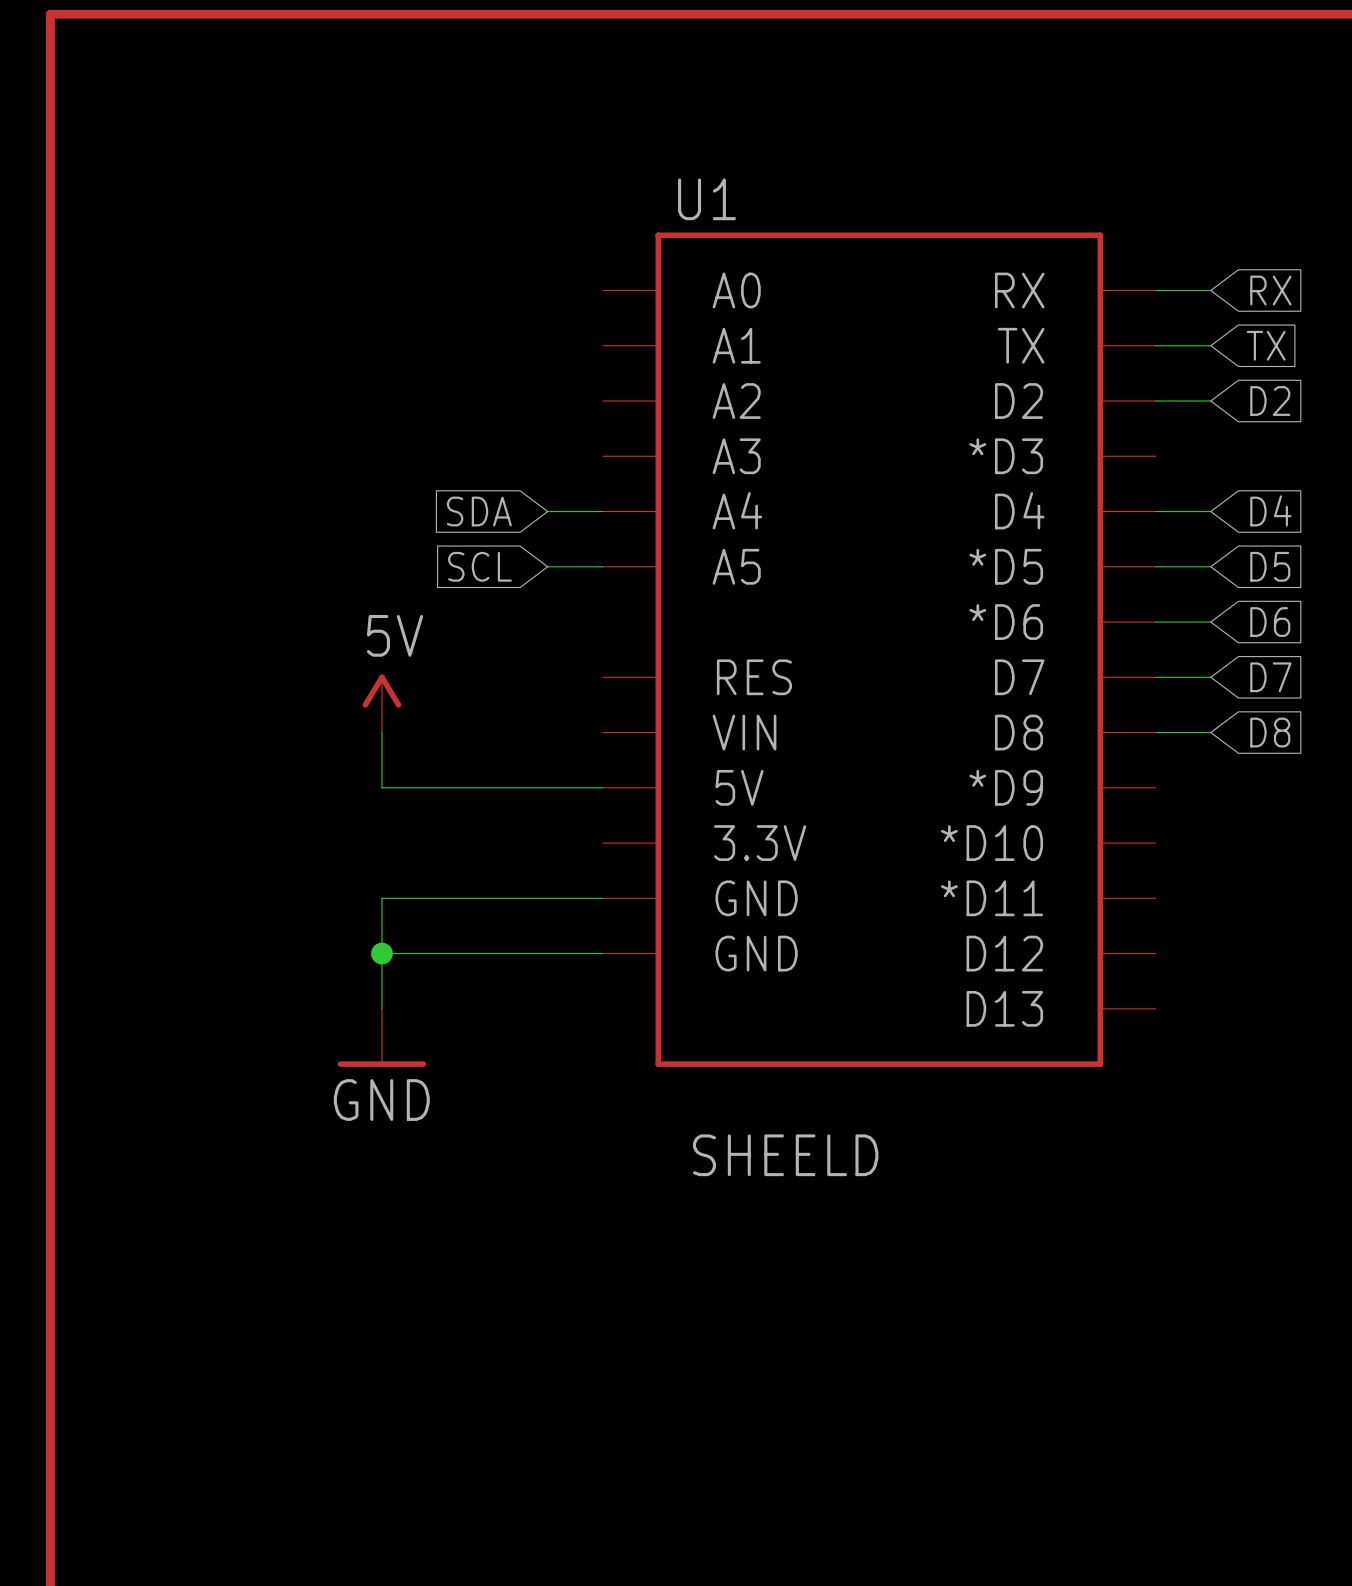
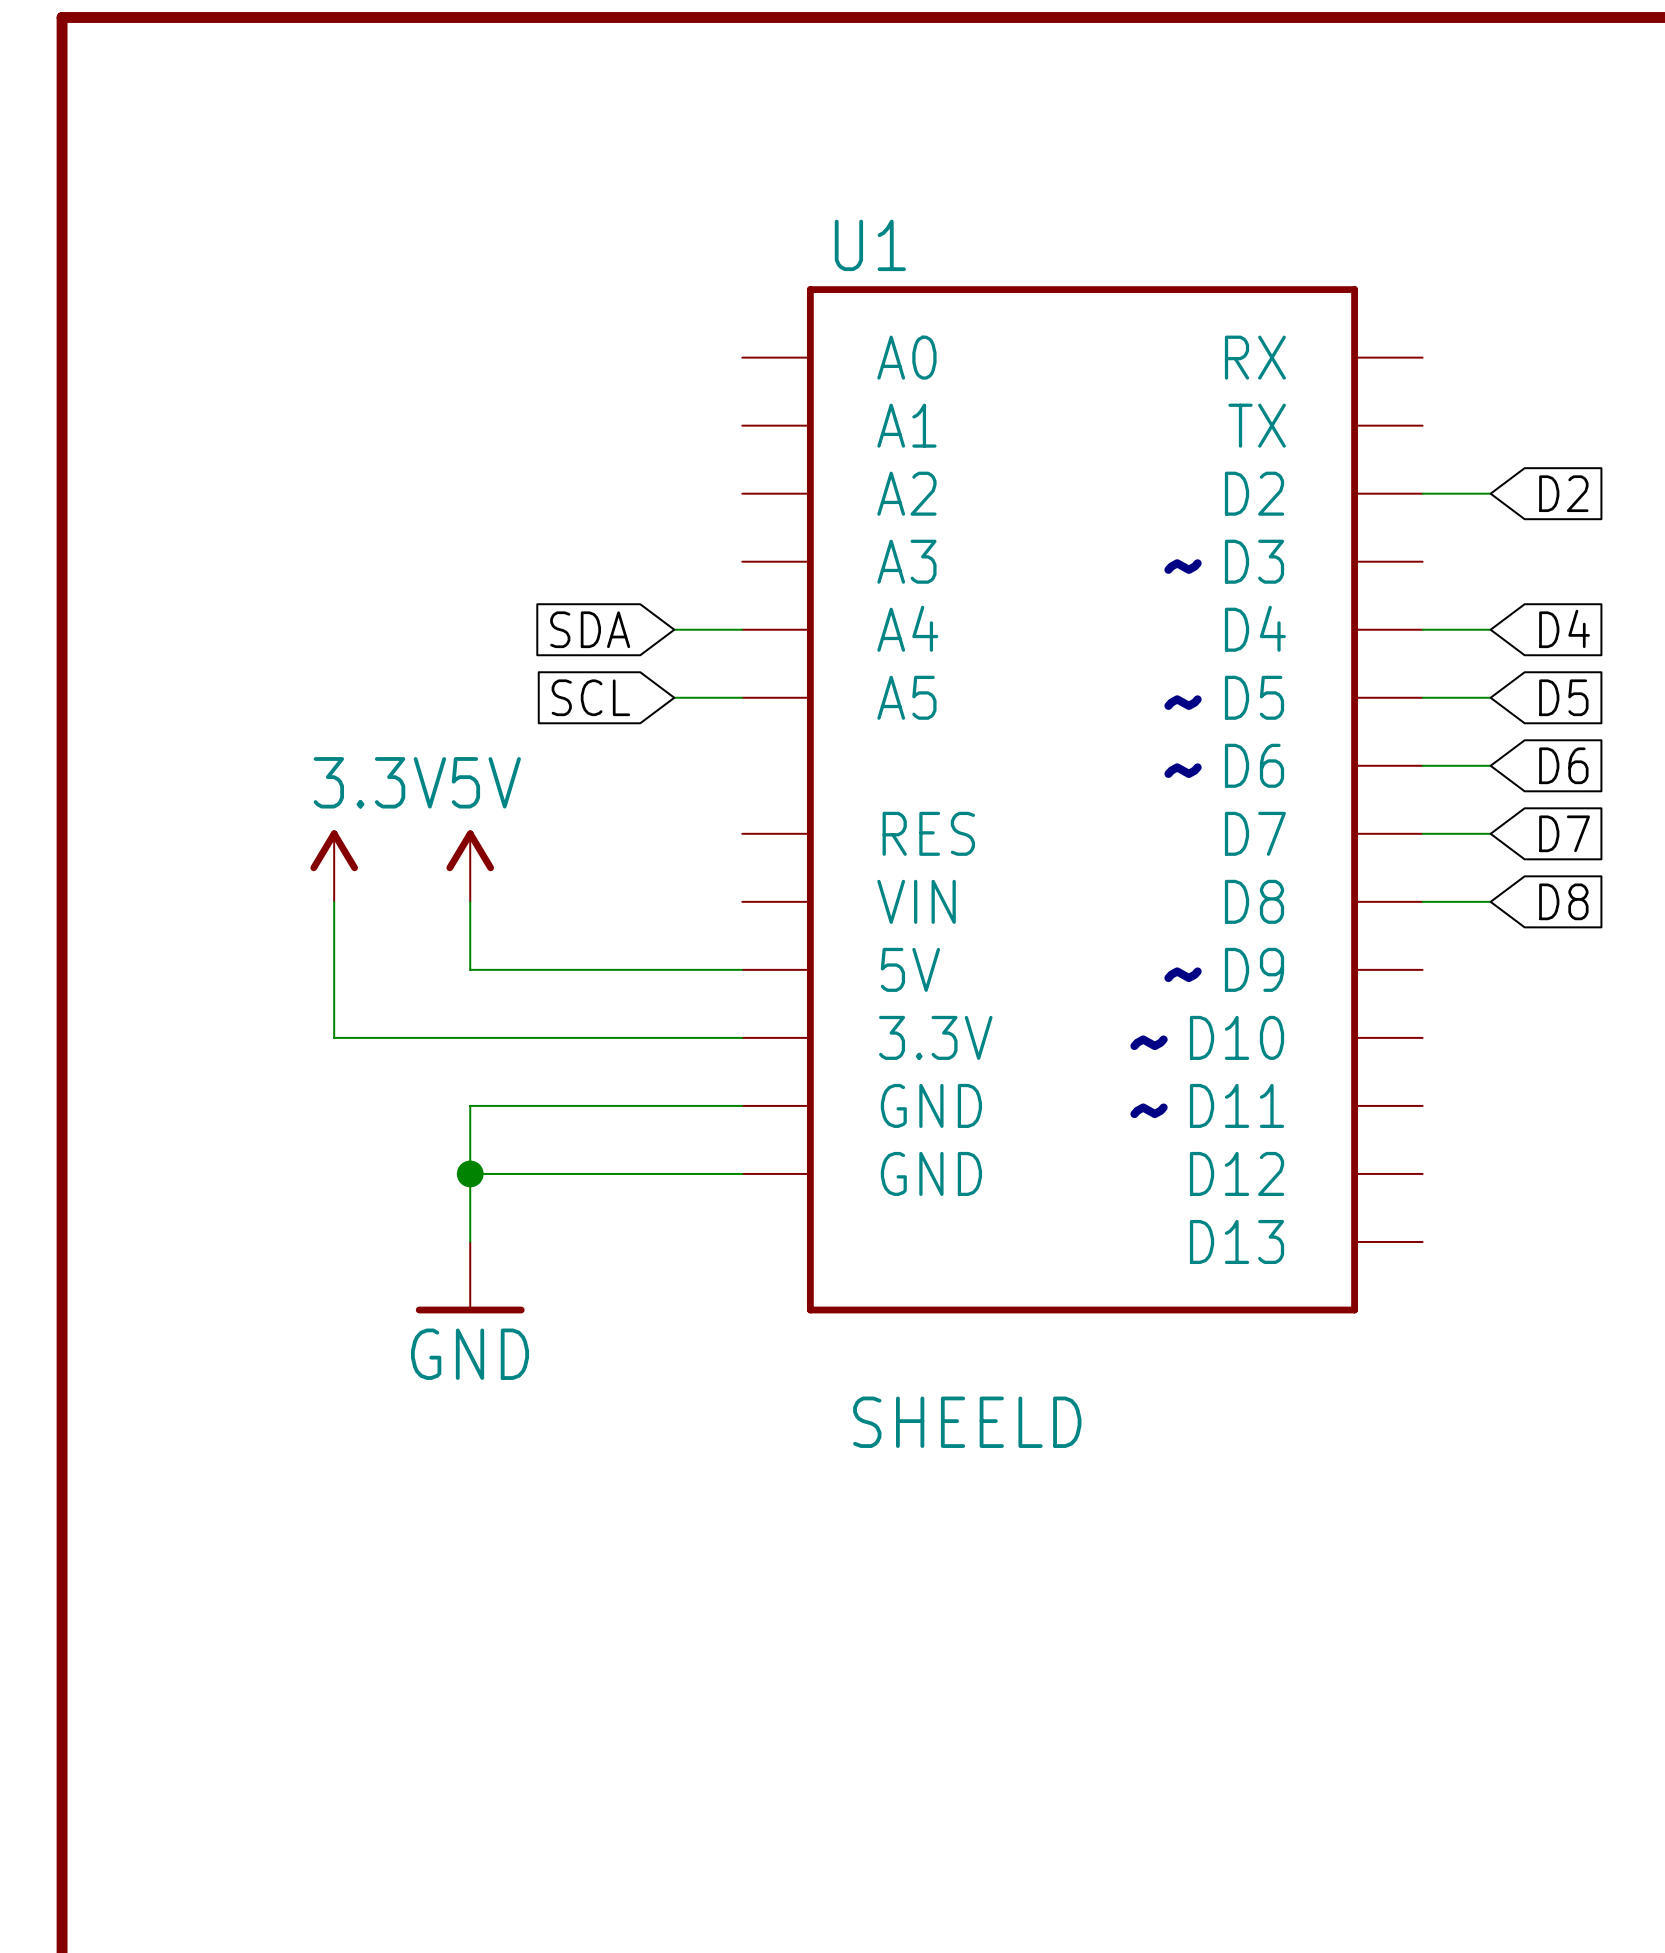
U1 symbol: [602, 232, 1156, 1067] -> [742, 286, 1423, 1314]
wire: (1155, 290) (1210, 290) -> none
global label: RX (1270, 290) -> none
wire: (1155, 345) (1210, 345) -> none
global label: TX (1266, 345) -> none
power symbol: none -> 3.3V (334, 866)
wire: none -> (334, 901) (334, 1037) (742, 1037)

